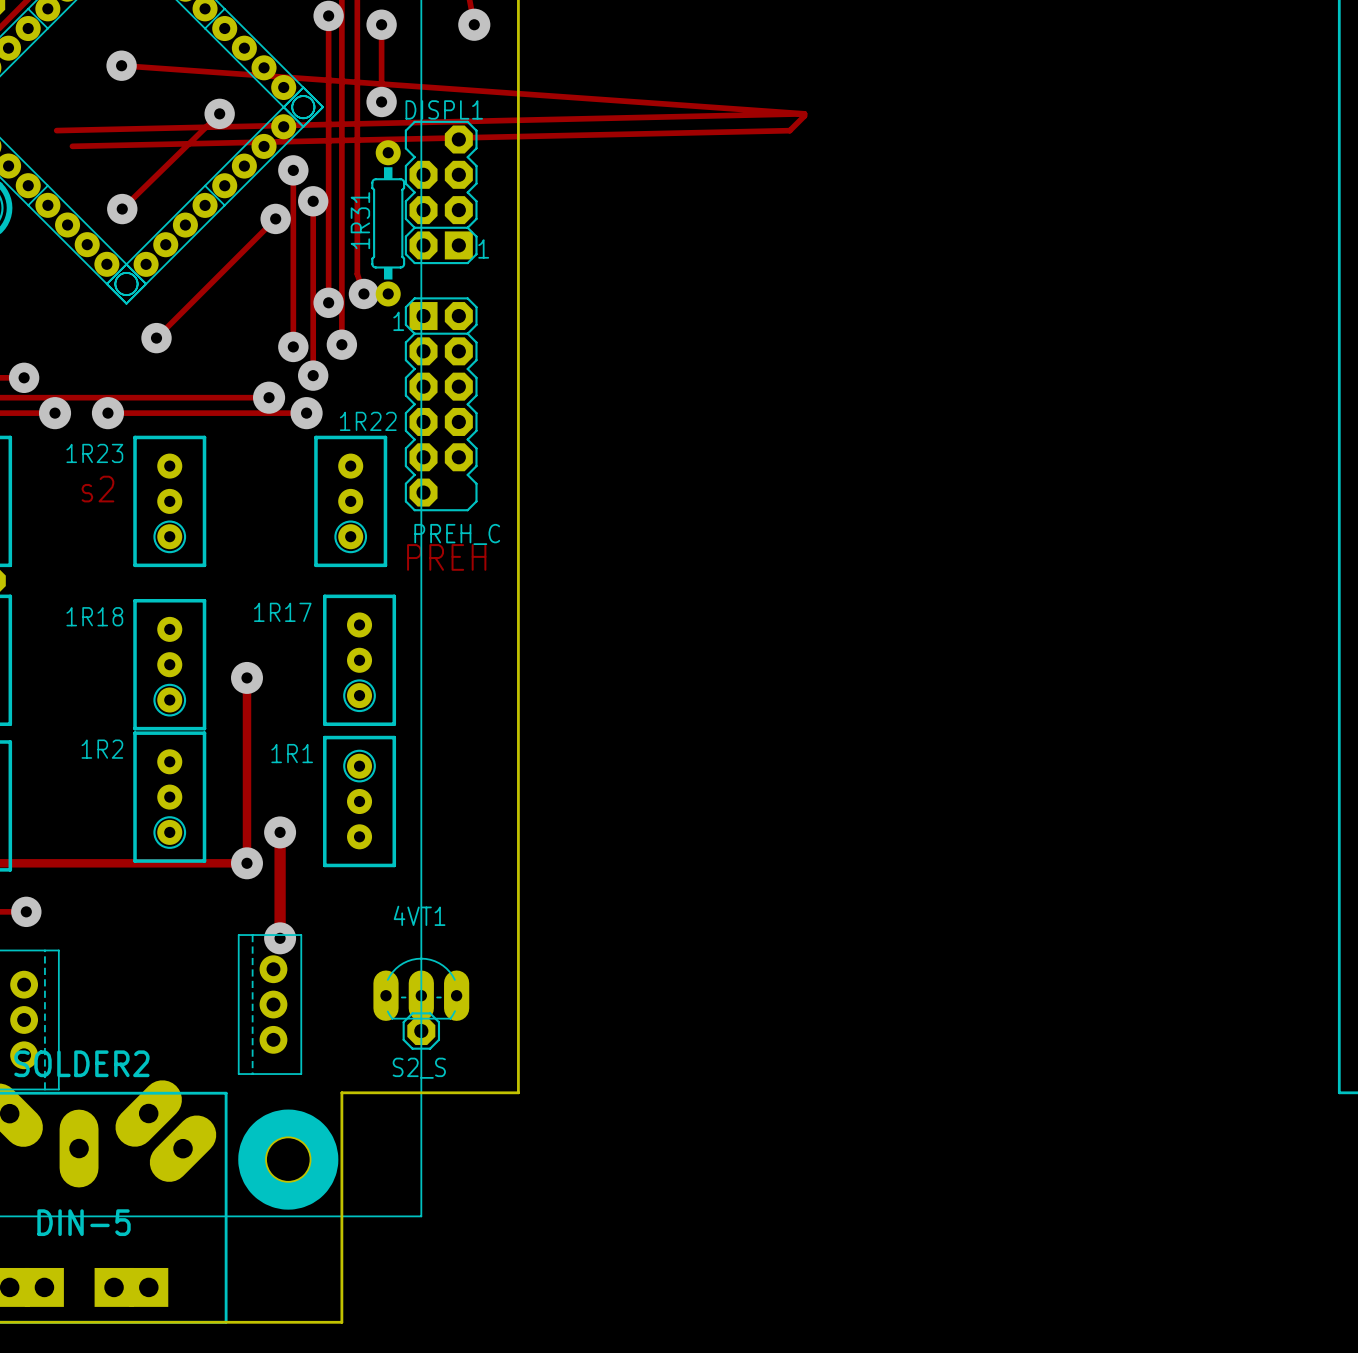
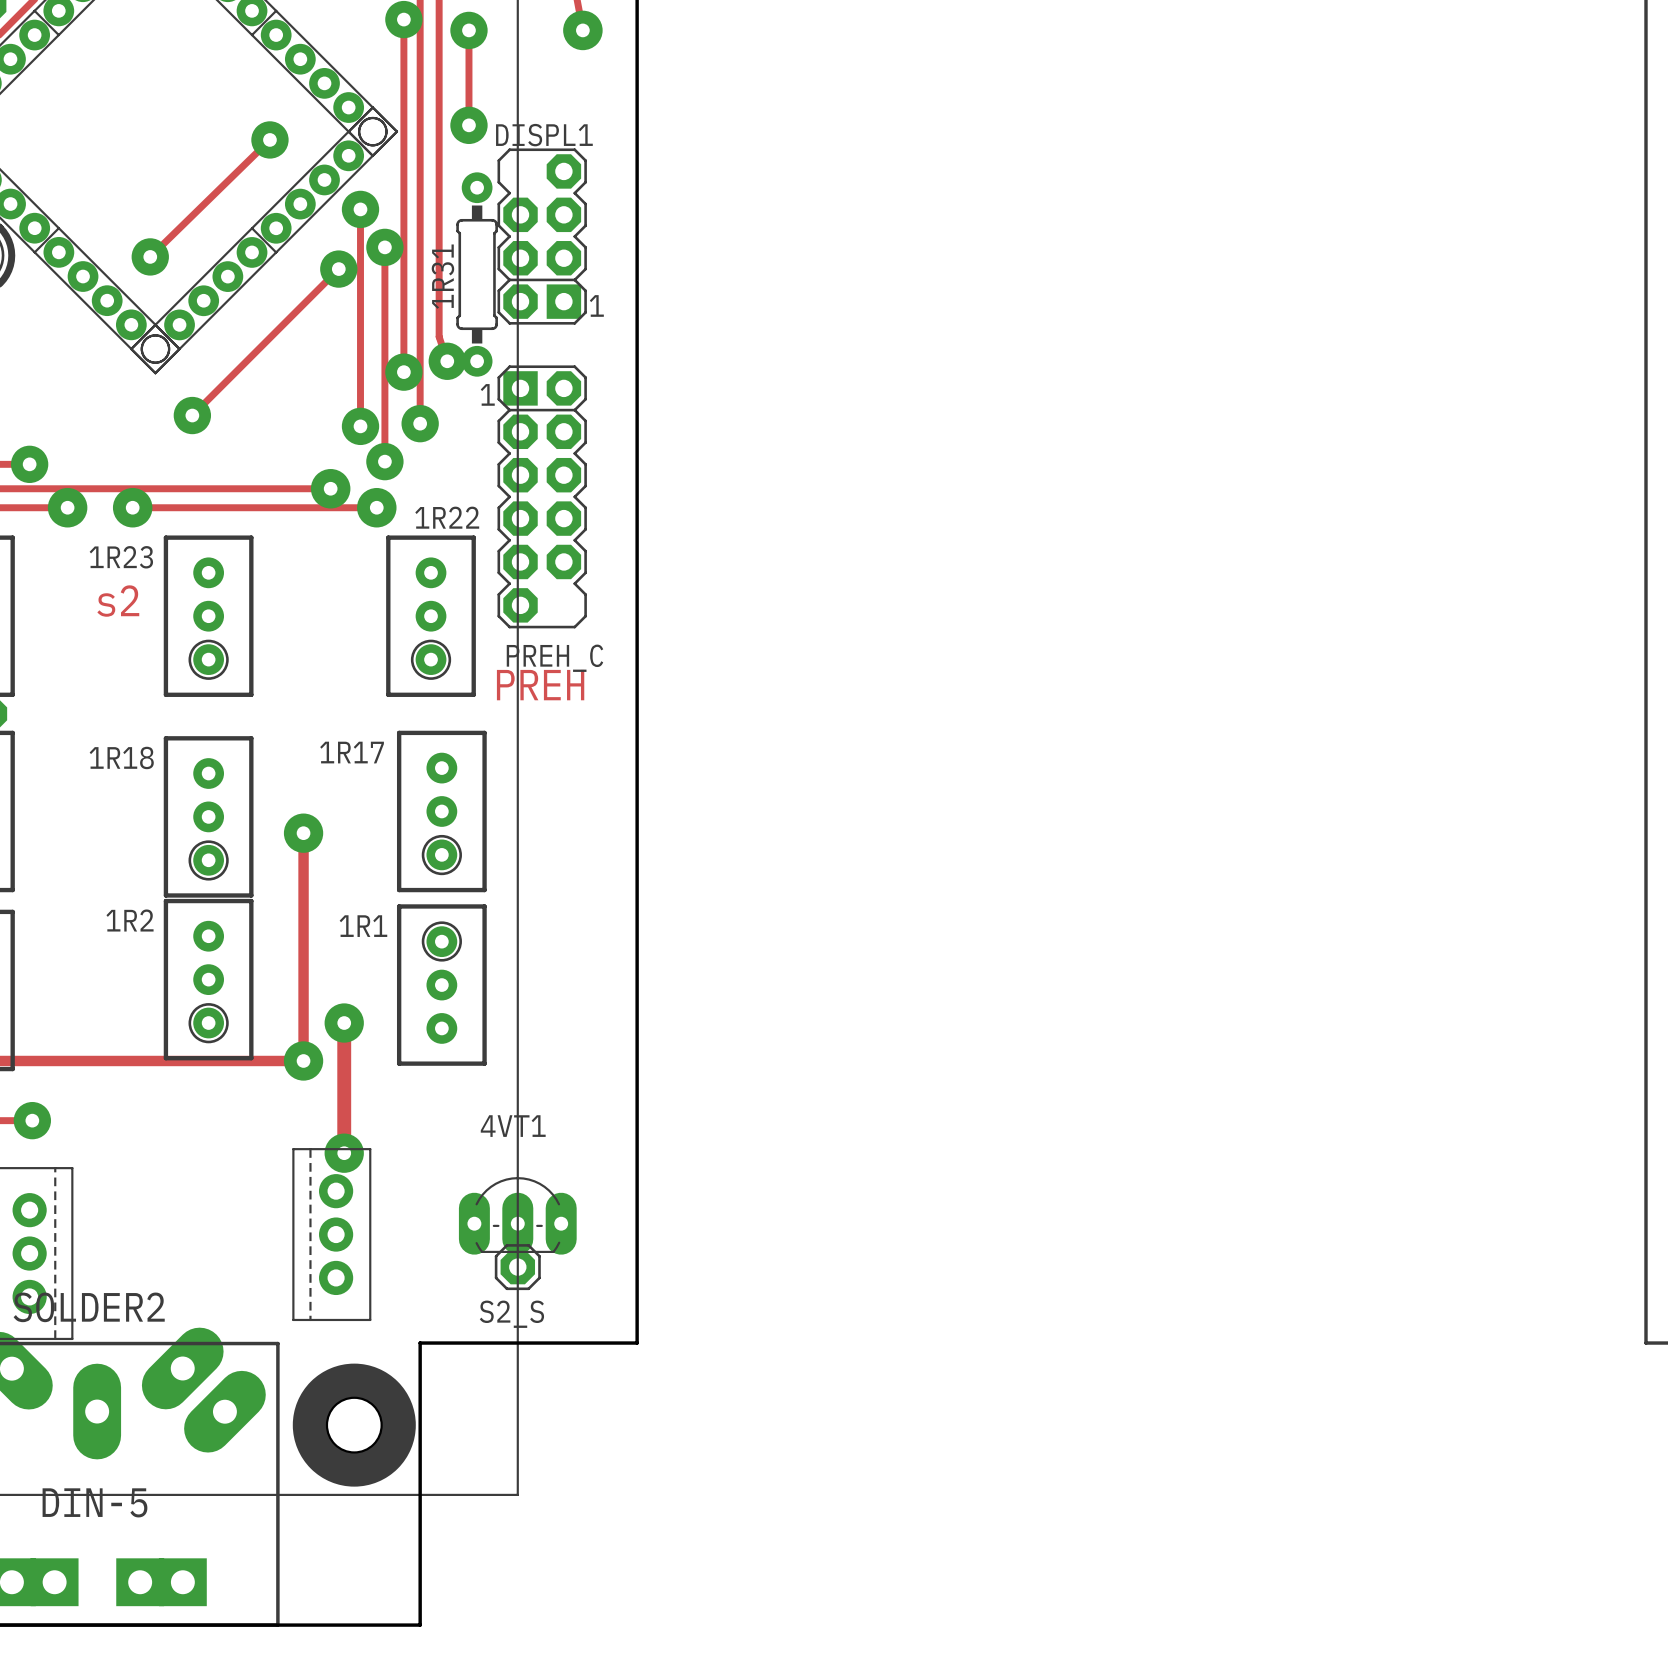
track: (121, 65) (804, 113) -> none
via: (121, 65) -> none
track: (804, 113) (56, 130) -> none
track: (804, 113) (789, 130) (72, 146) -> none

